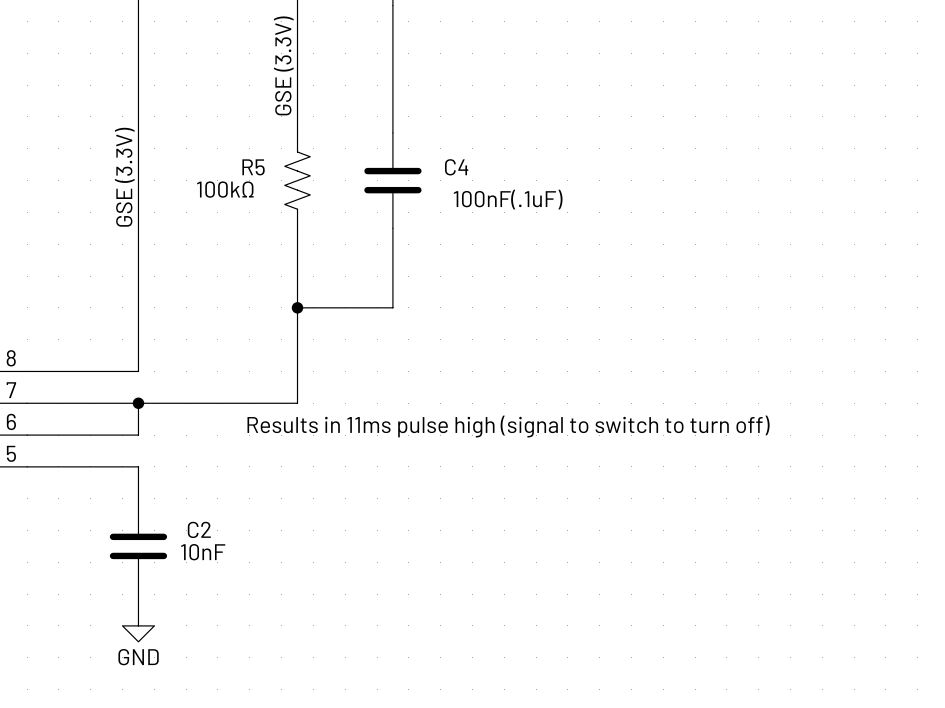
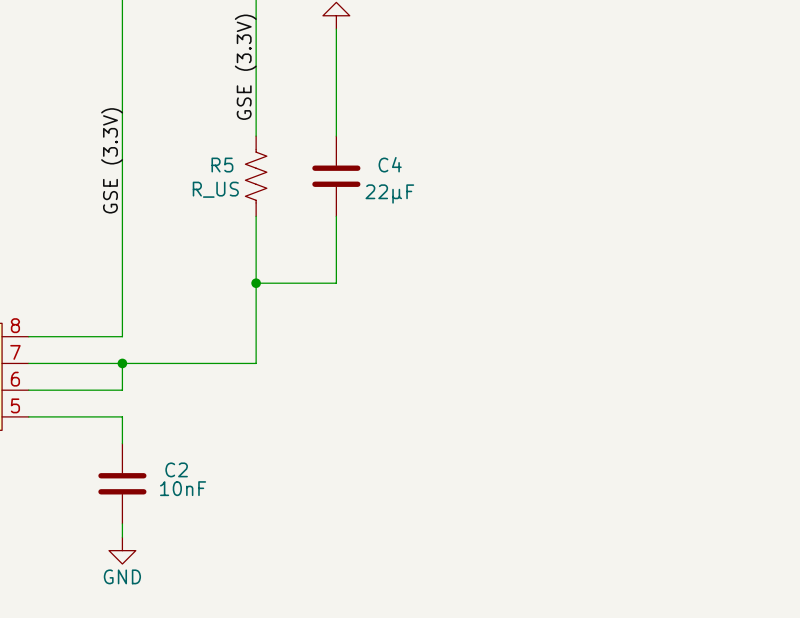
R5 value: 100kΩ (225, 189) -> R_US (215, 189)
C4 value: 100nF(.1uF) (508, 199) -> 22μF (389, 194)
text: Results in 11ms pulse high (signal to switch to turn off) (508, 426) -> none

